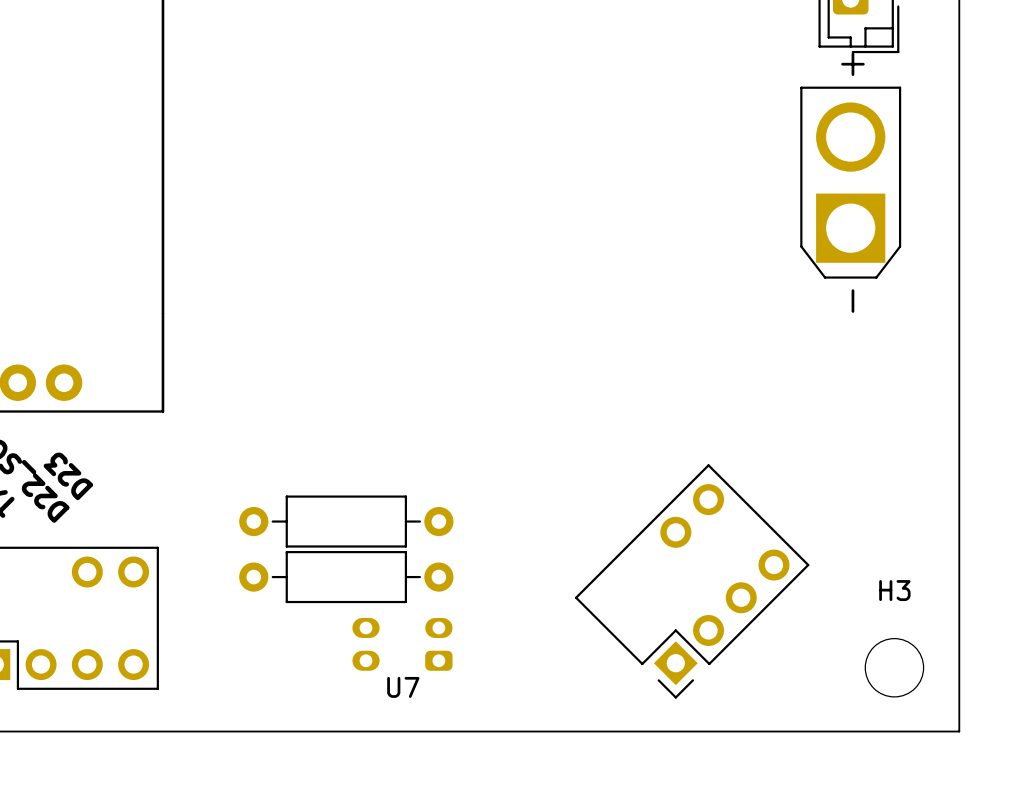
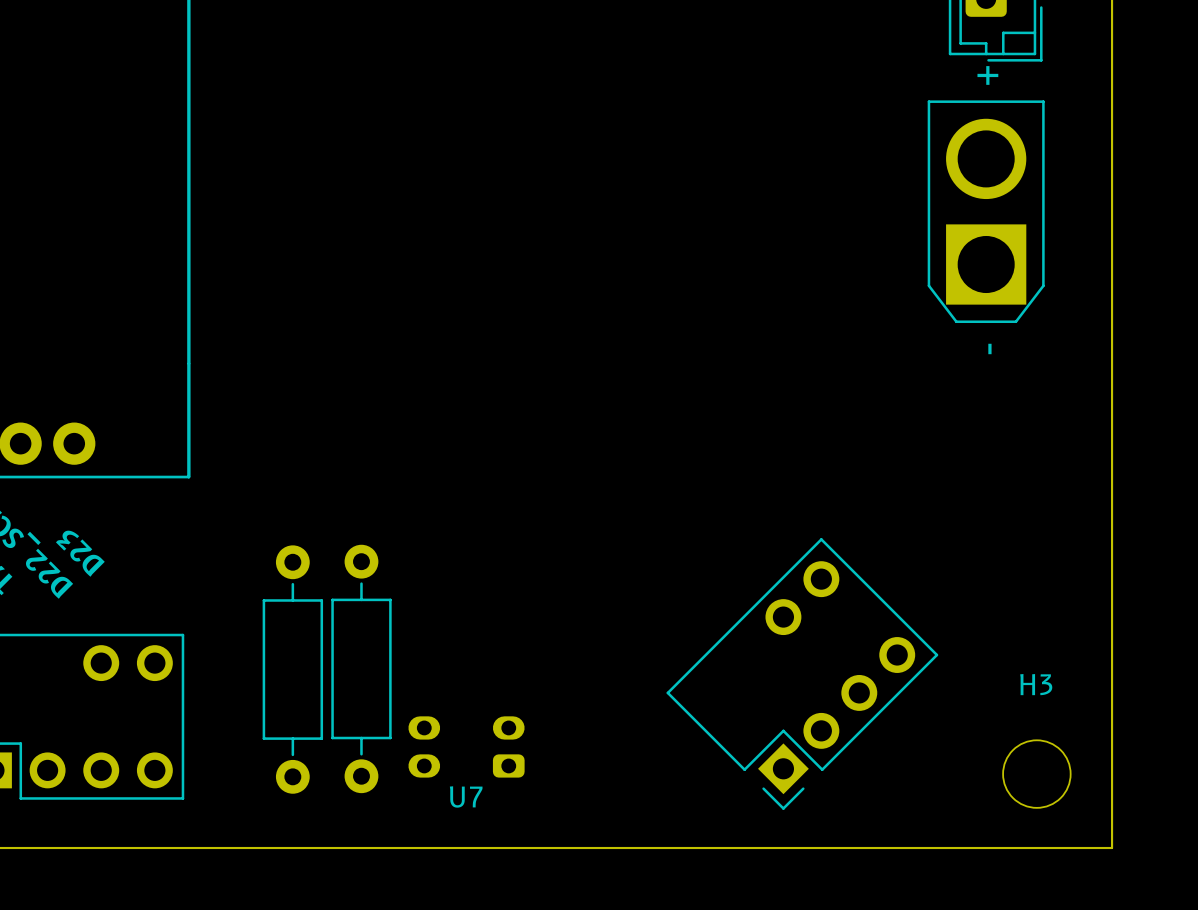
part: (346, 521) -> none
part: none -> (292, 669)
part: none -> (361, 668)
part: (346, 577) -> none

